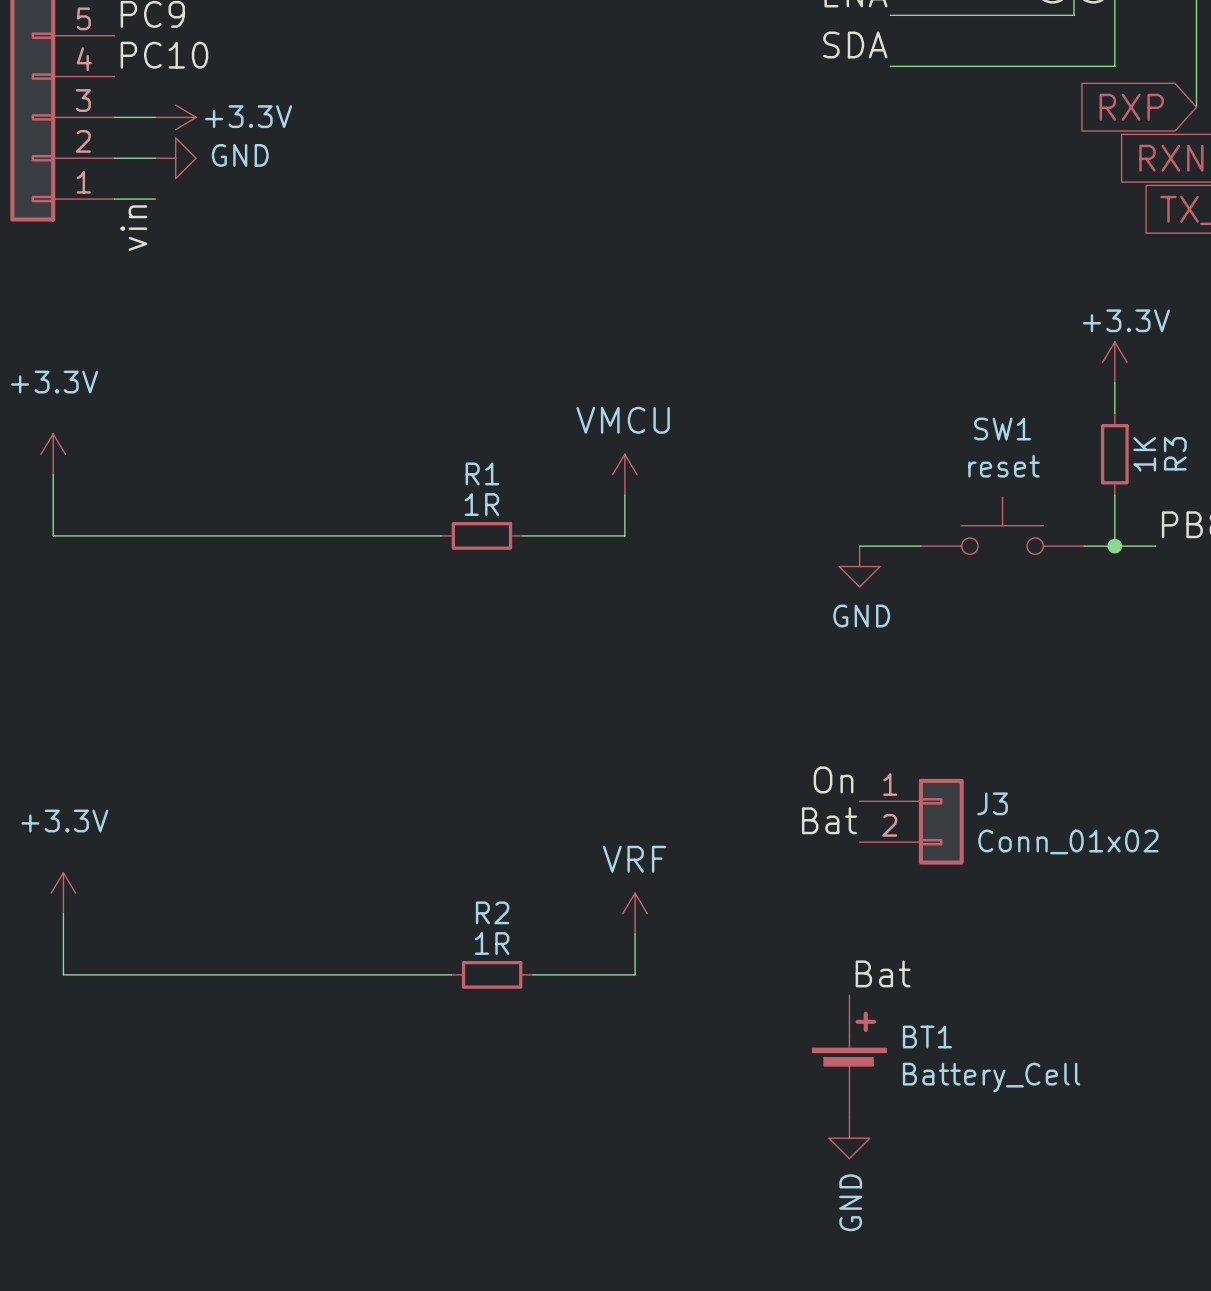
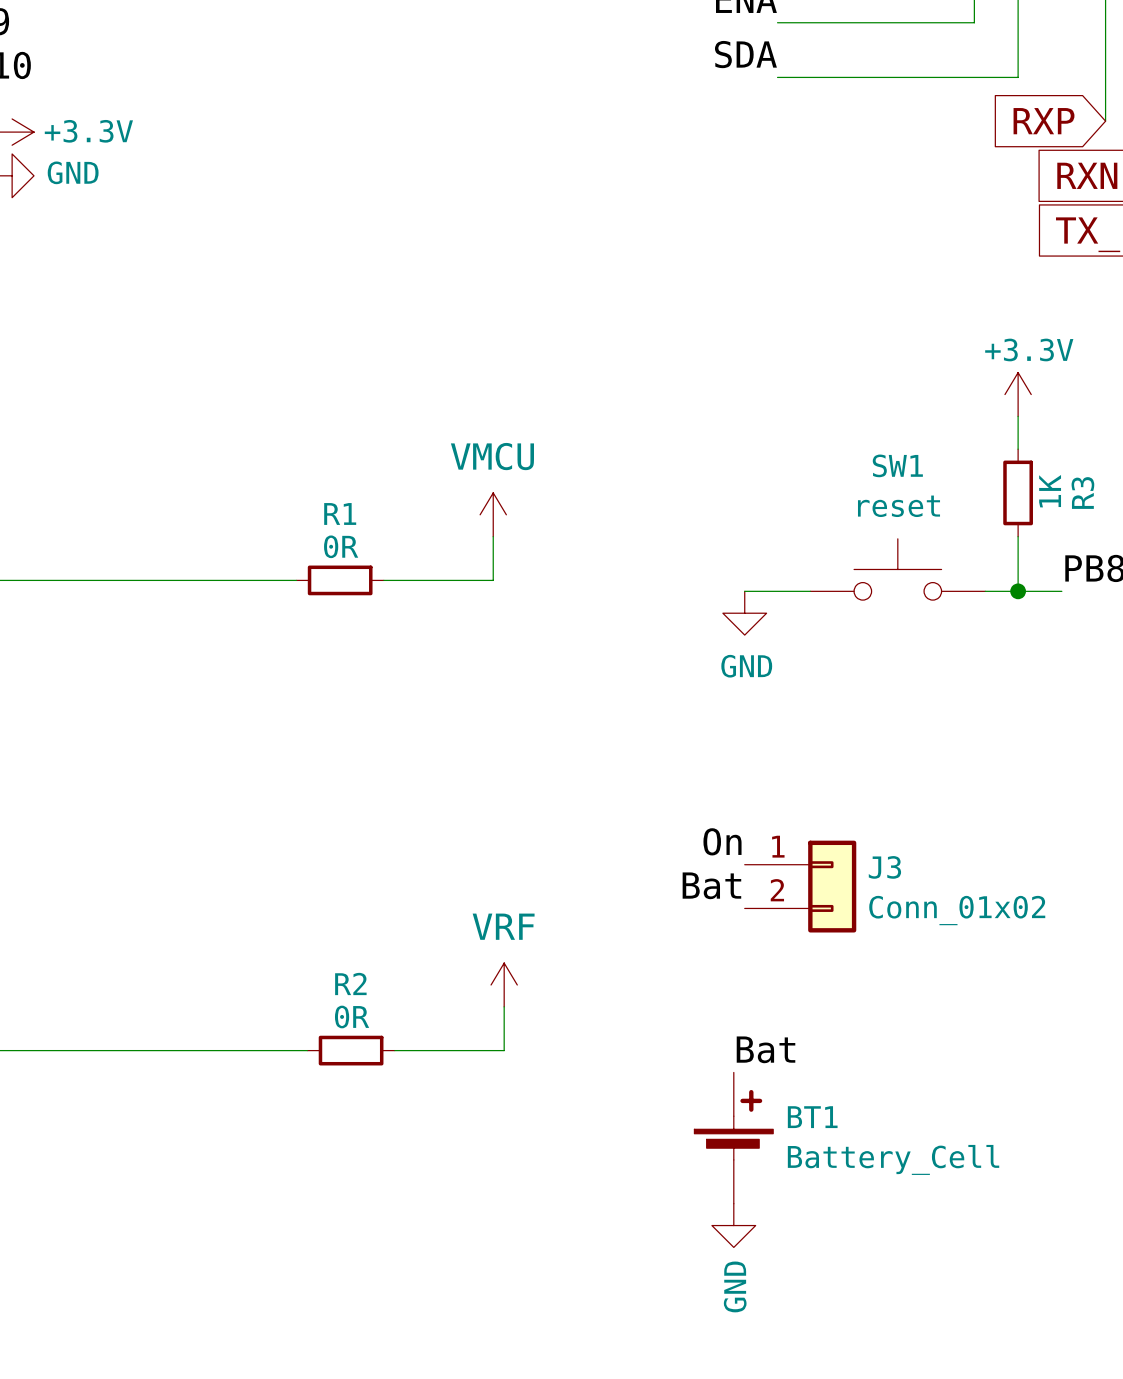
R1 value: 1R (481, 504) -> 0R (341, 546)
R2 value: 1R (492, 943) -> 0R (352, 1016)

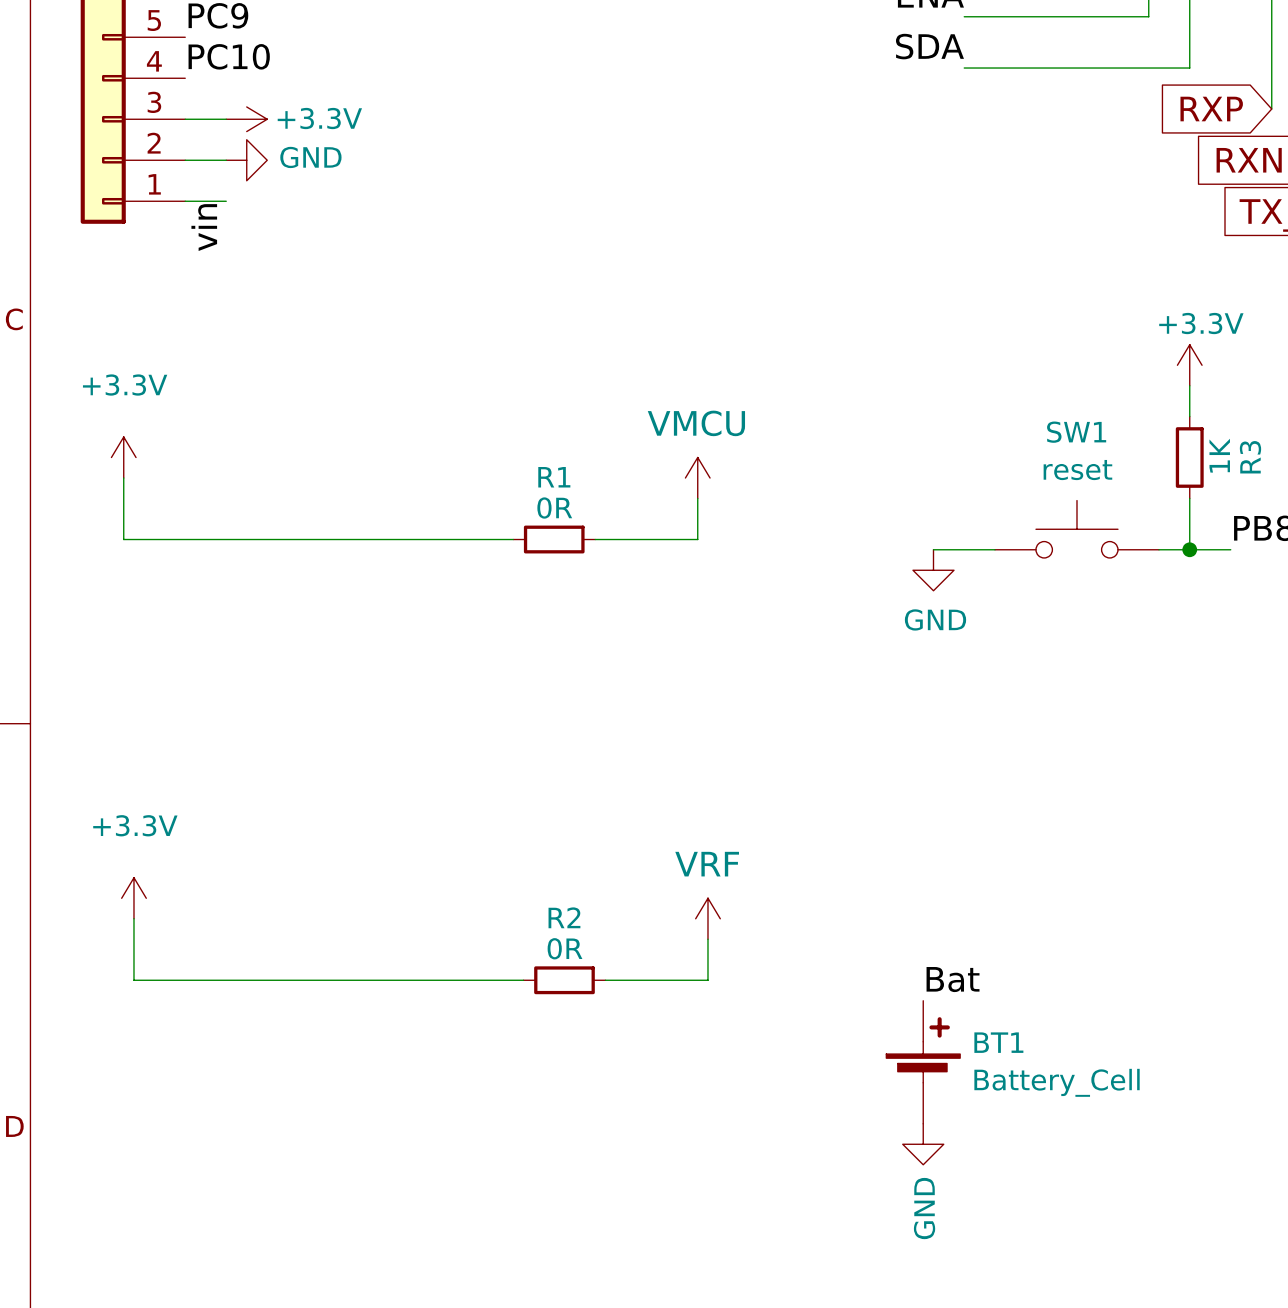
label: On (722, 841) -> none
label: Bat (711, 885) -> none
J3: Conn_01x02 (800, 886) -> none

